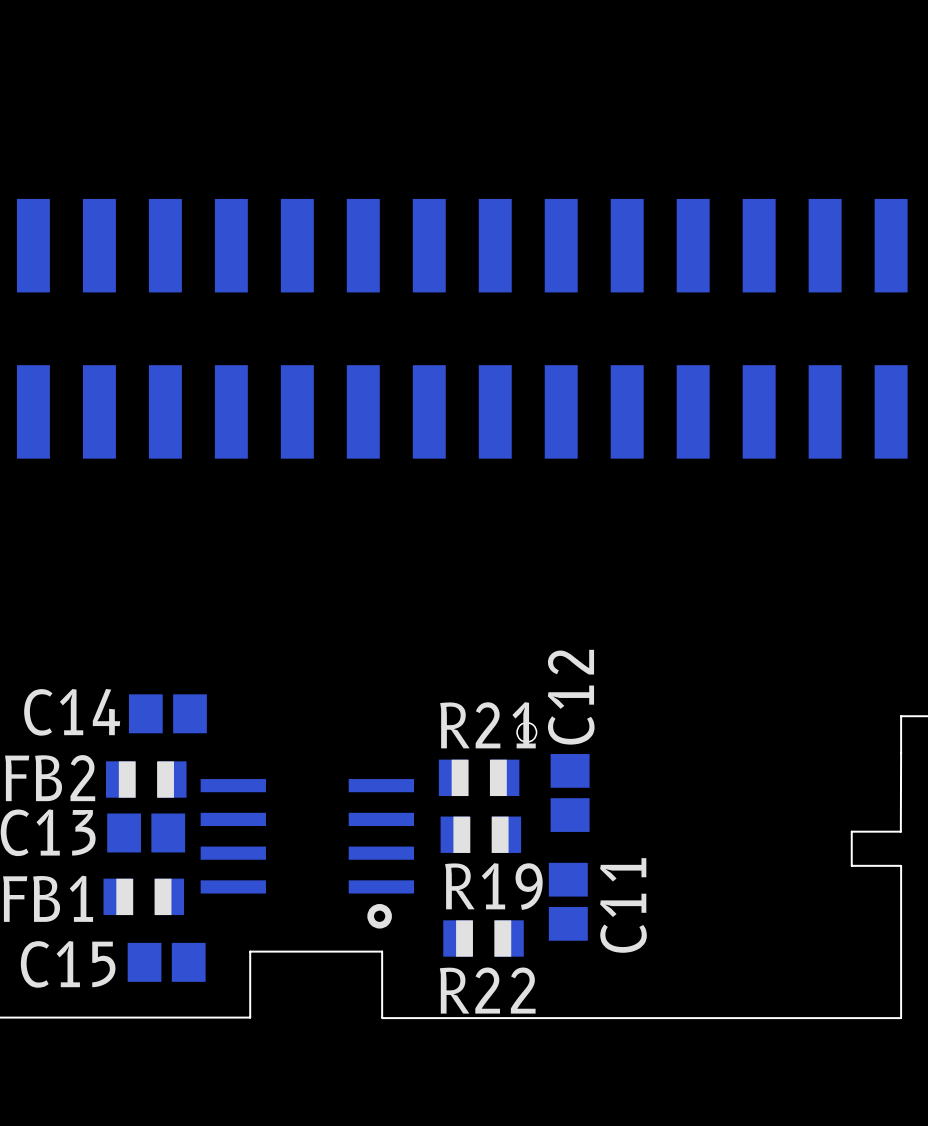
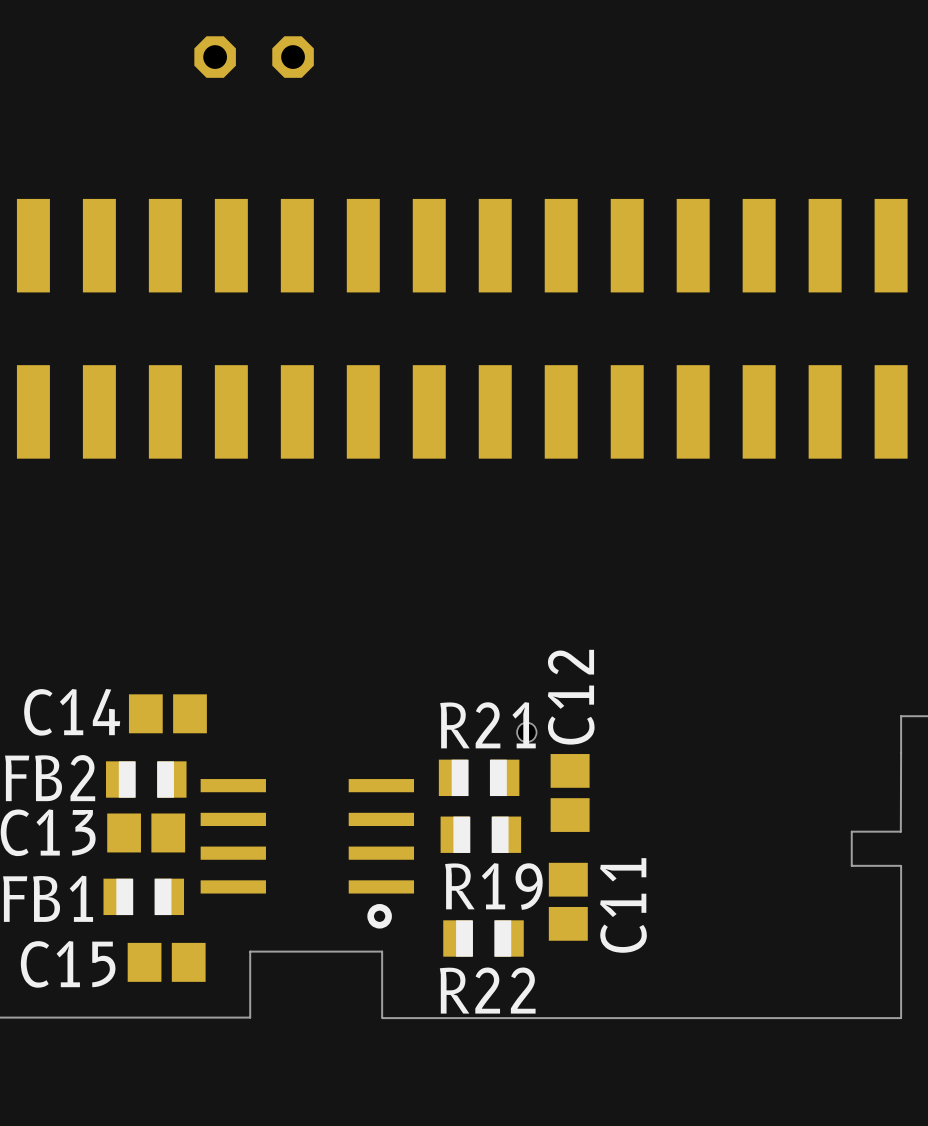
part: none -> (215, 57)
part: none -> (293, 57)

